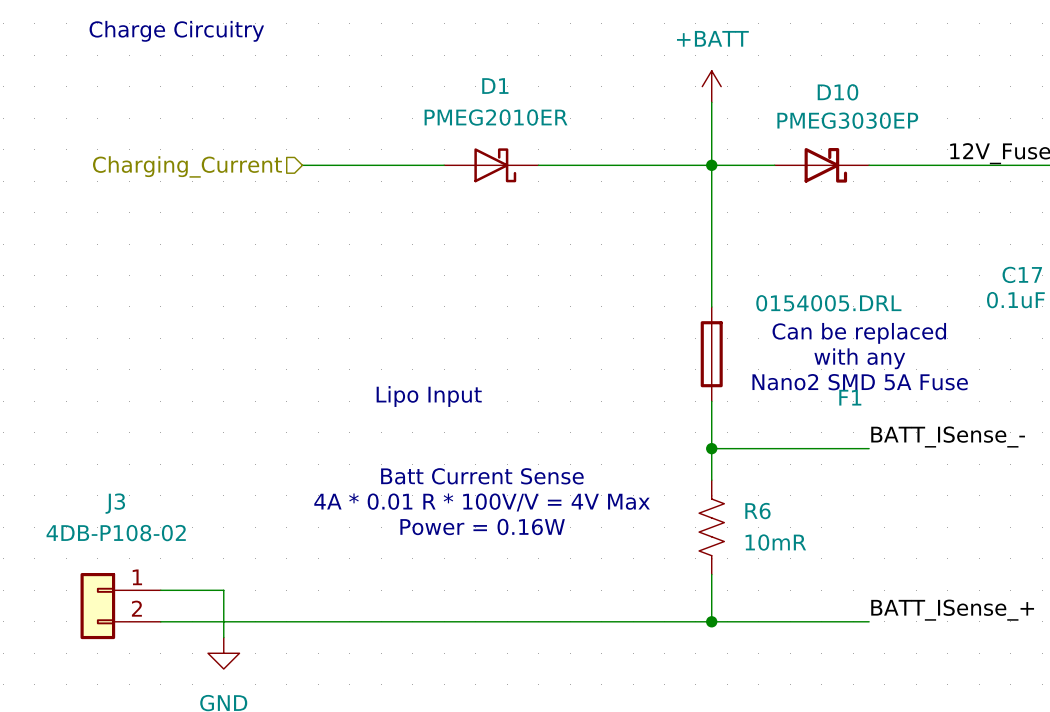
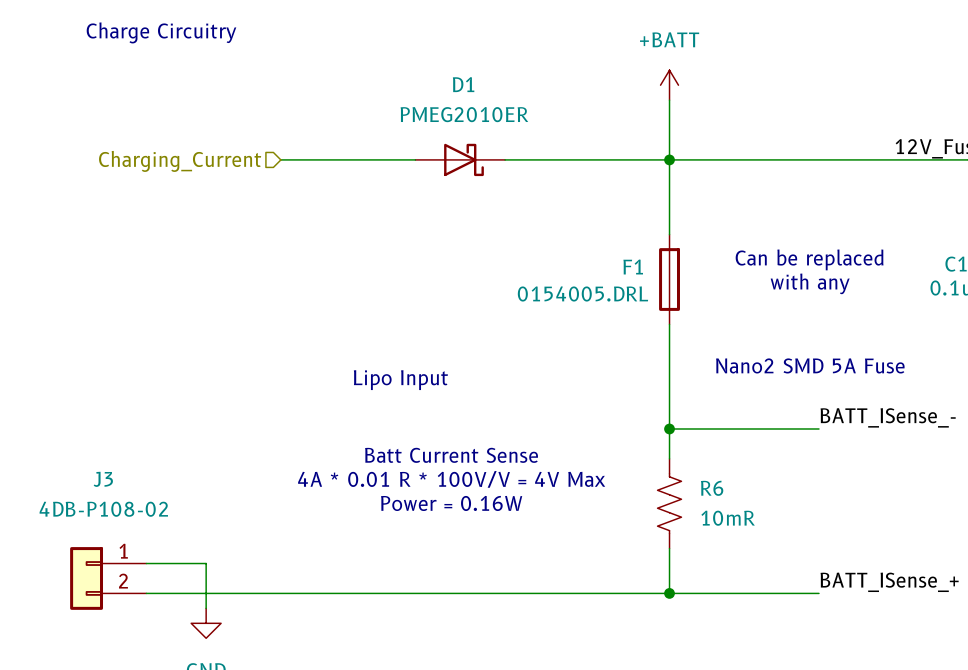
D10: PMEG3030EP (821, 165) -> none
F1 value position: 0154005.DRL (828, 303) -> 0154005.DRL (582, 293)
text position: Can be replaced (859, 333) -> Can be replaced (809, 259)
F1 position: (711, 354) -> (669, 279)
text position: with any (859, 358) -> with any (810, 283)
F1 name position: F1 (850, 397) -> F1 (633, 267)

